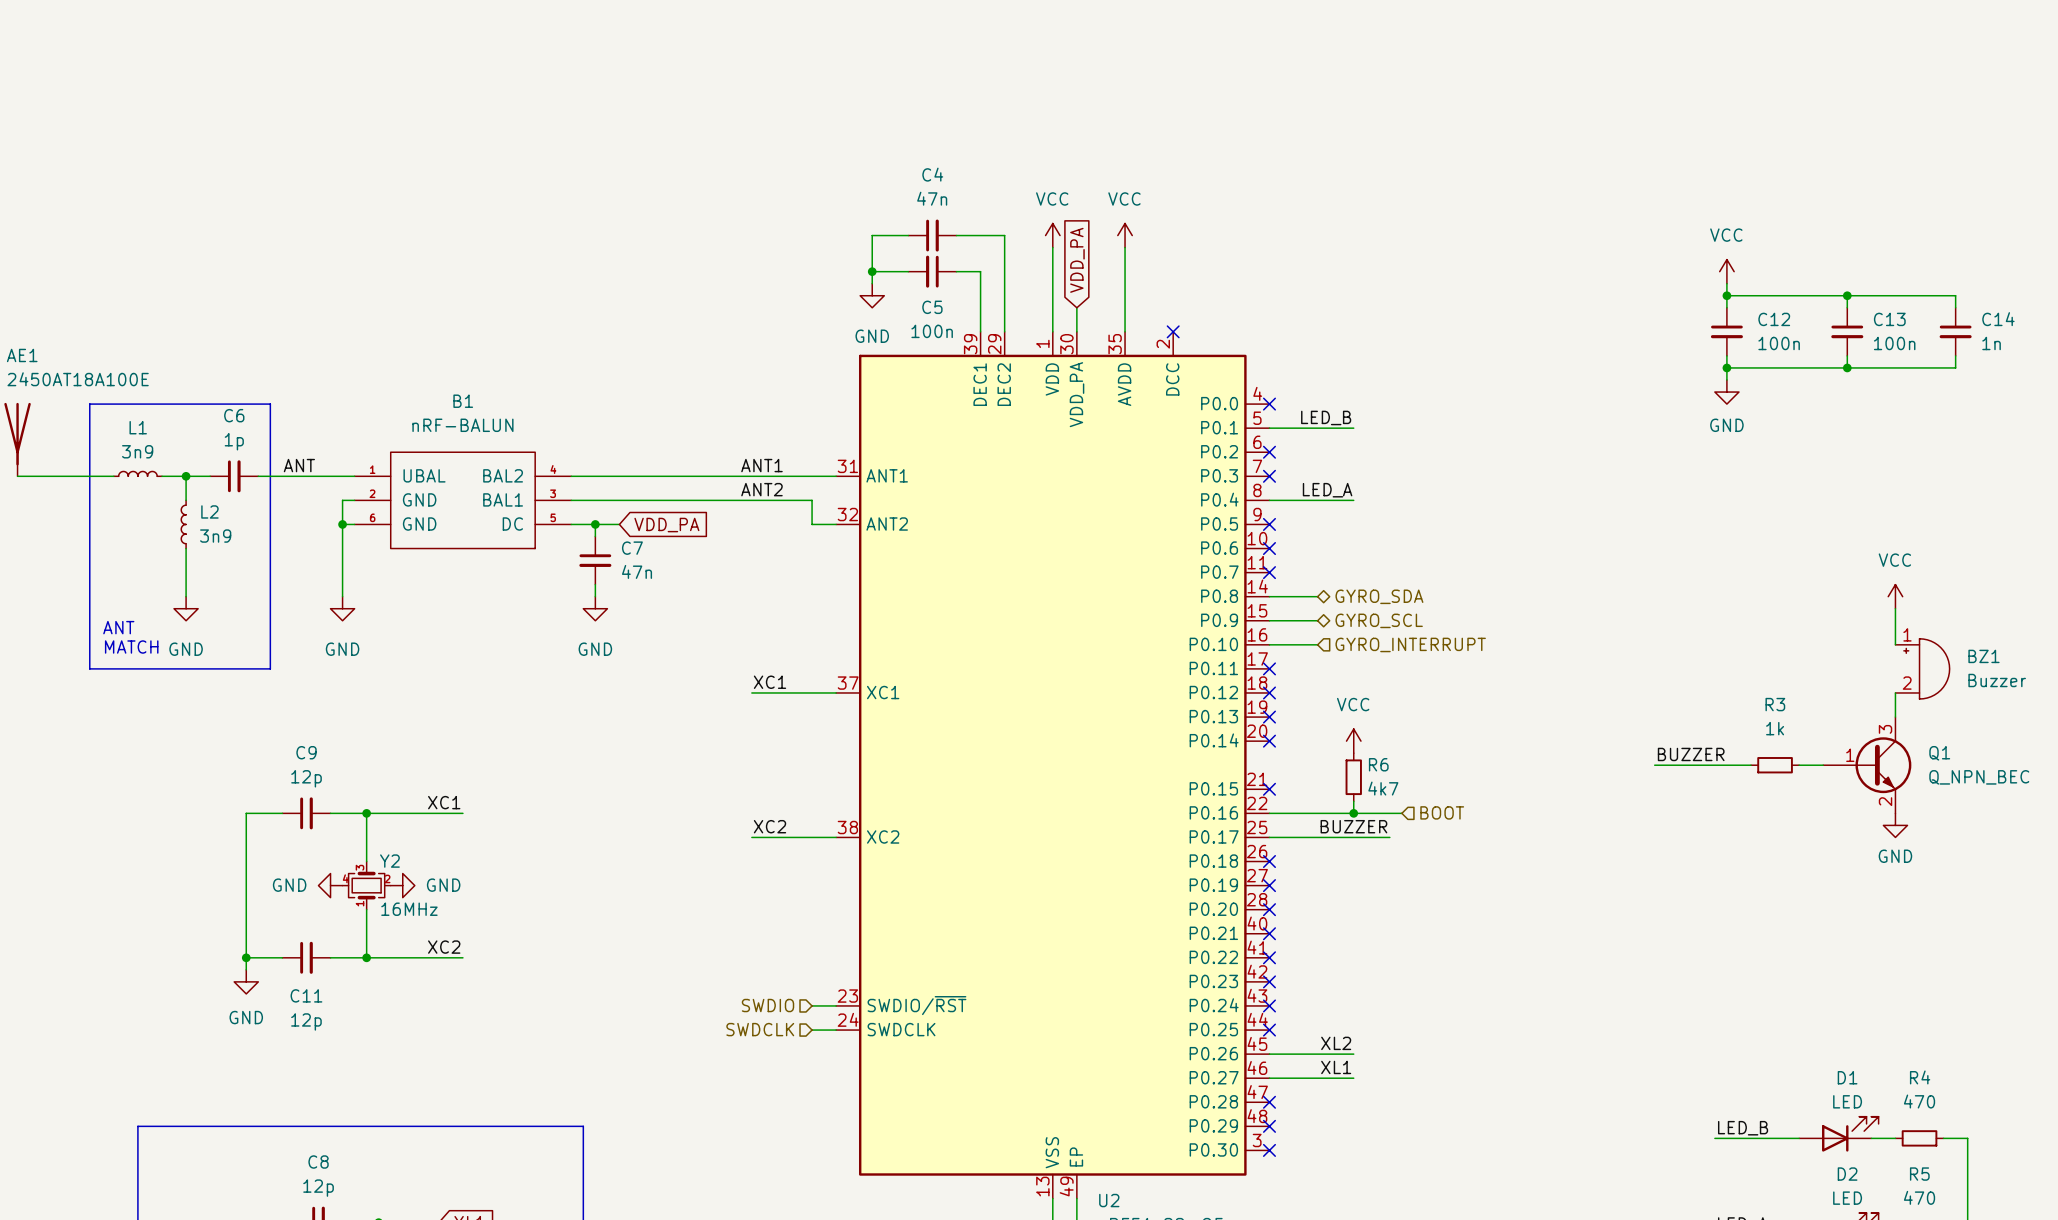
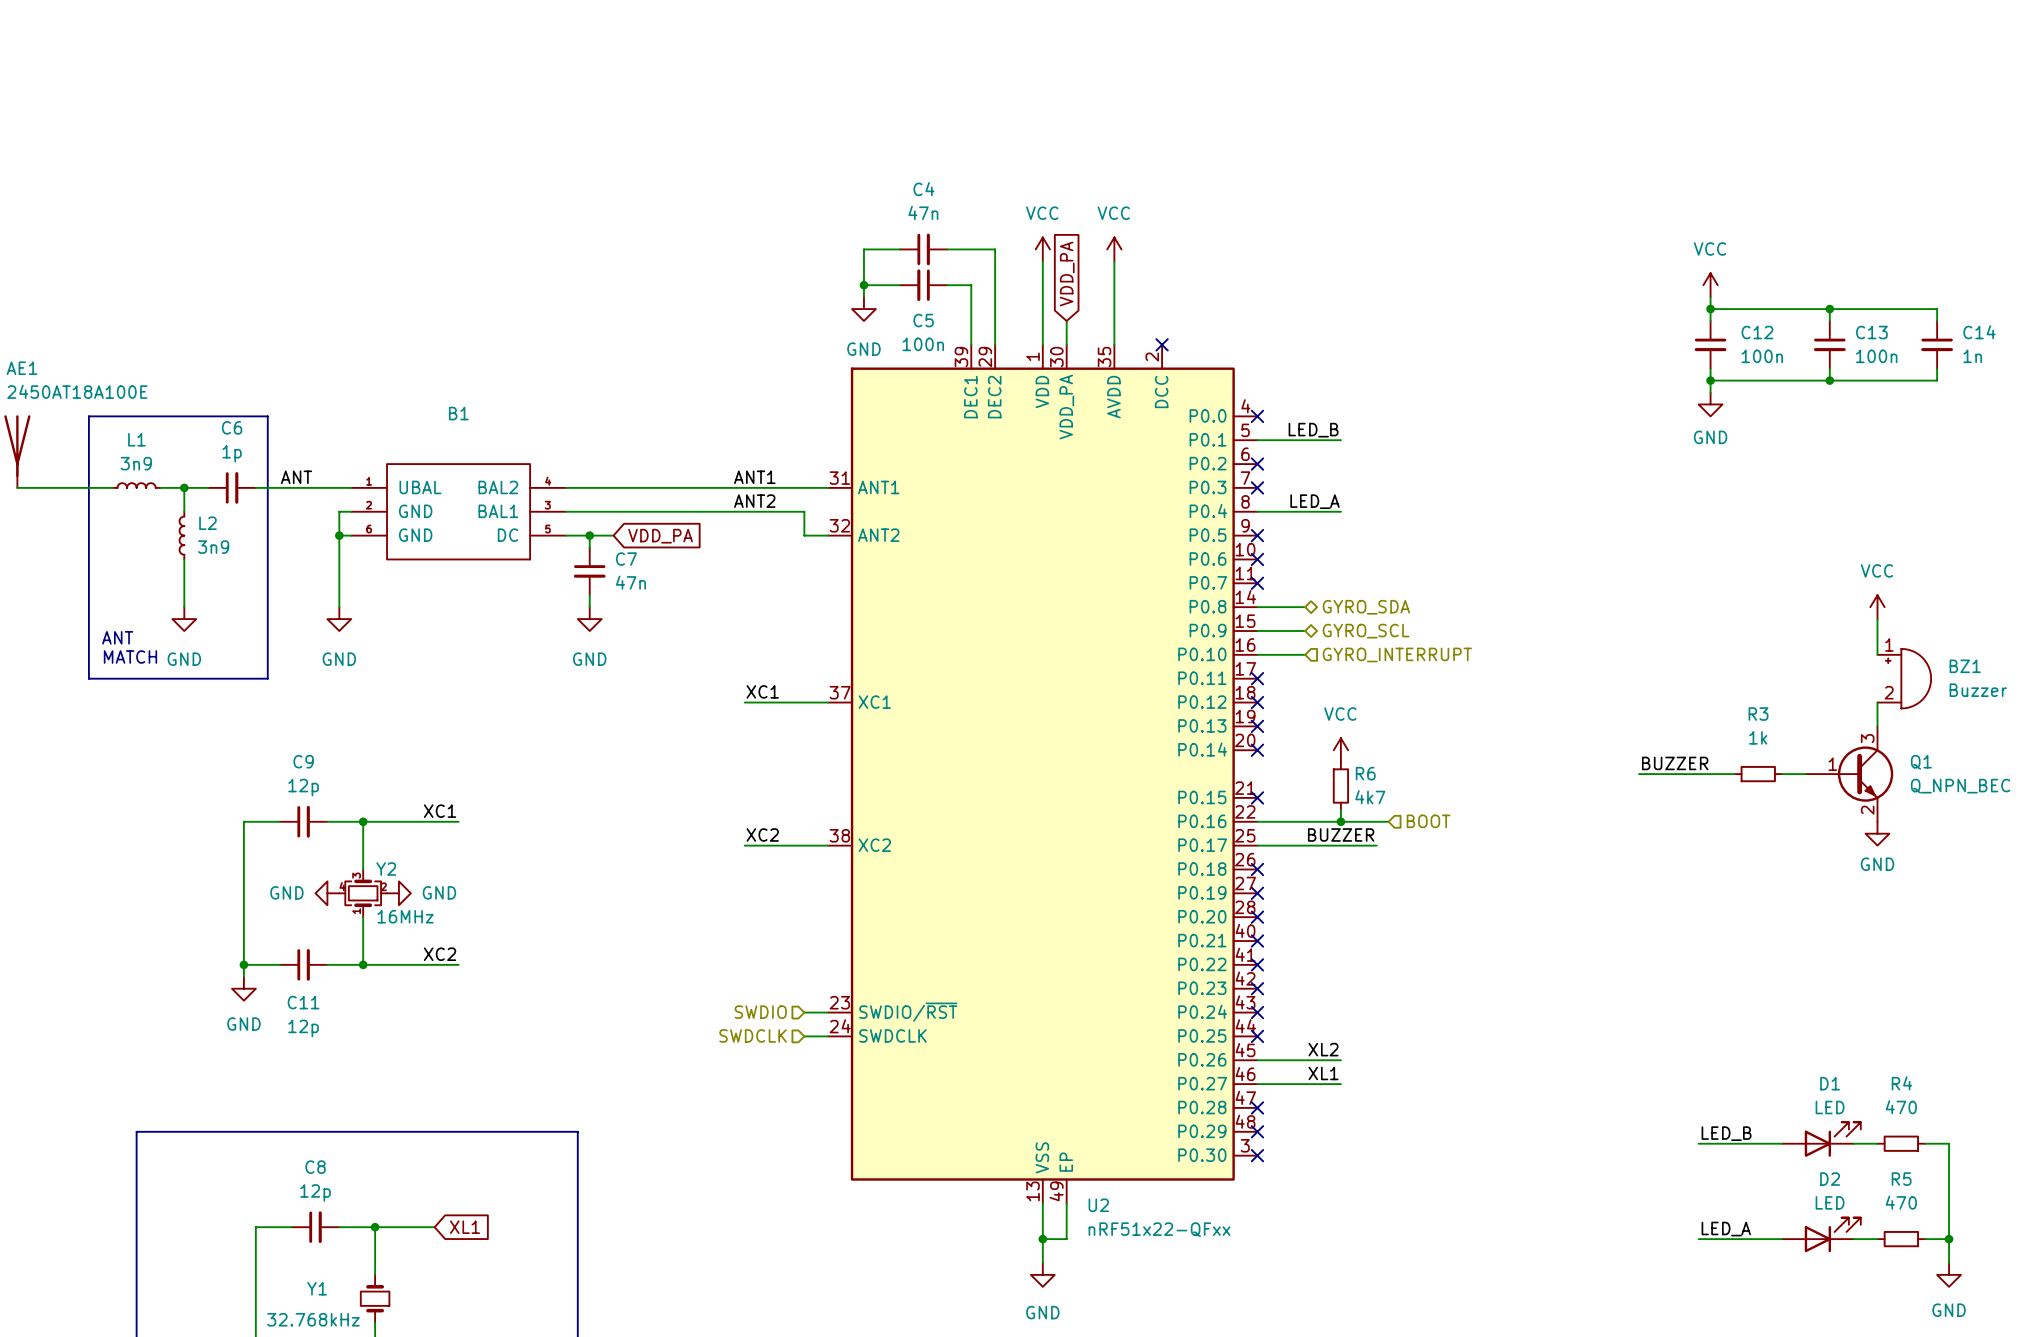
B1 value: nRF-BALUN (462, 425) -> none

